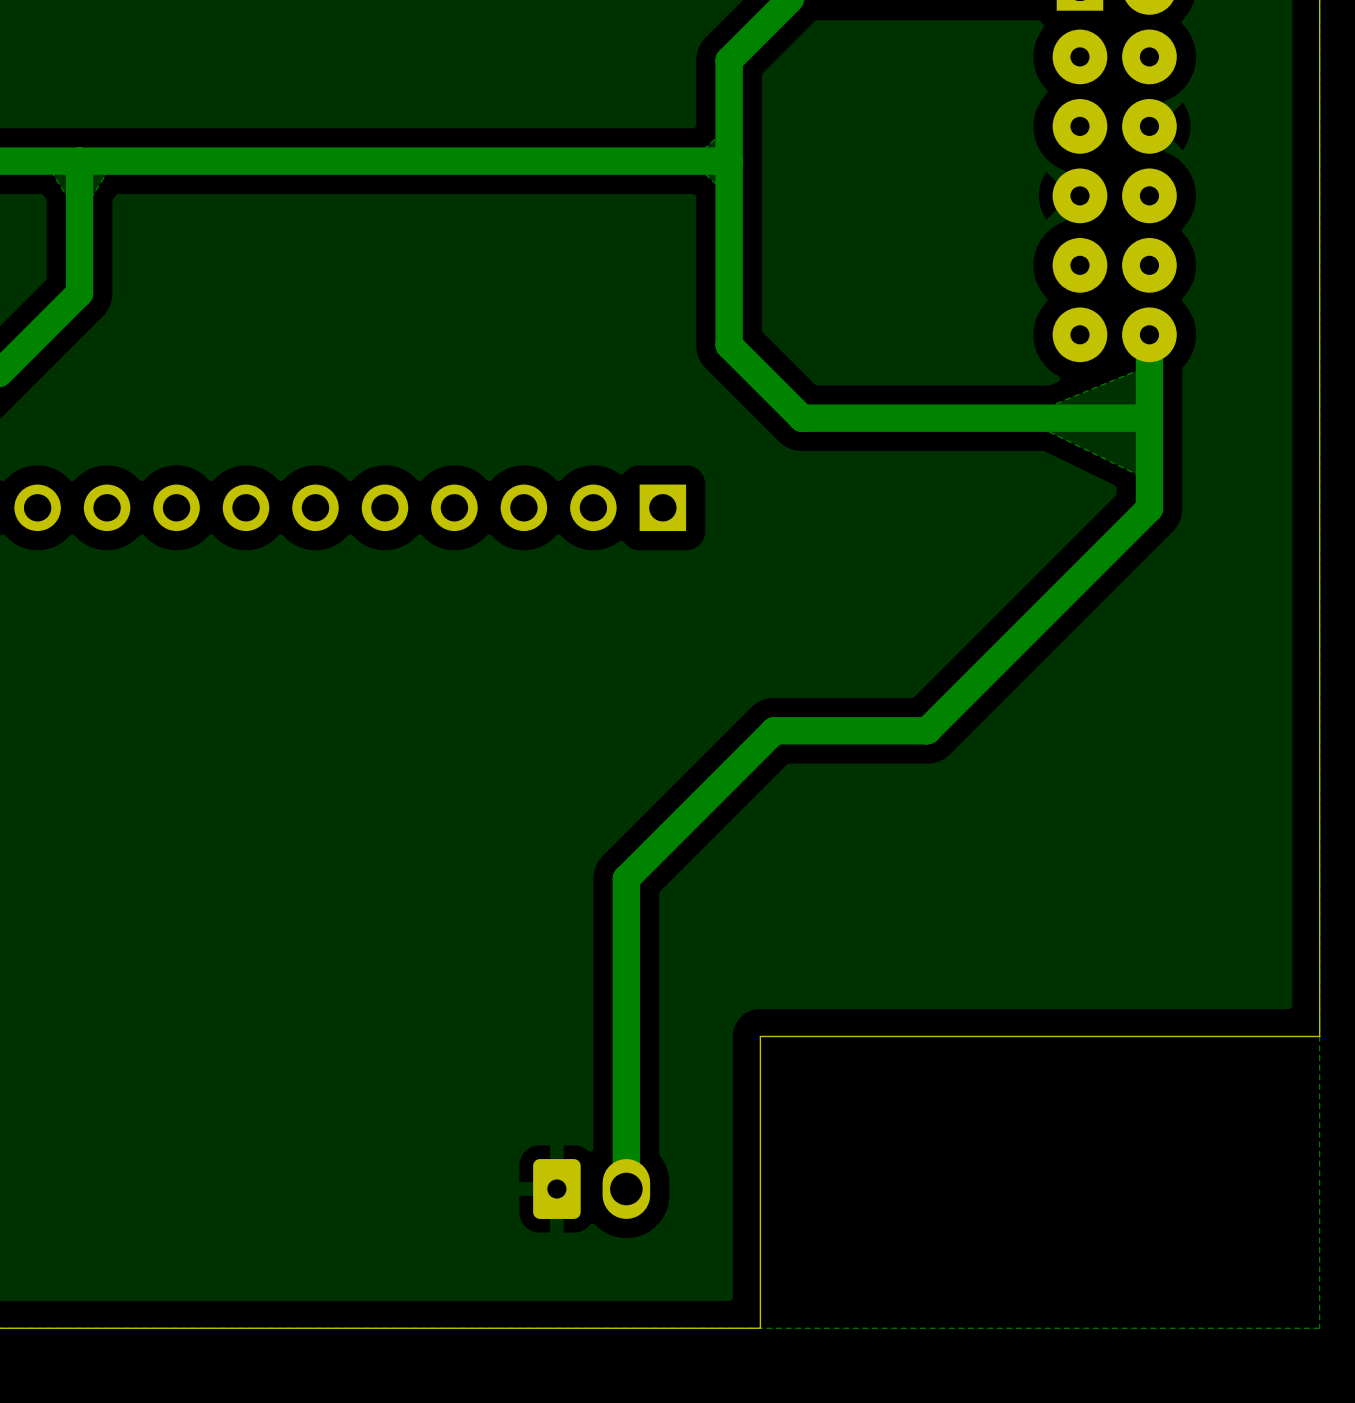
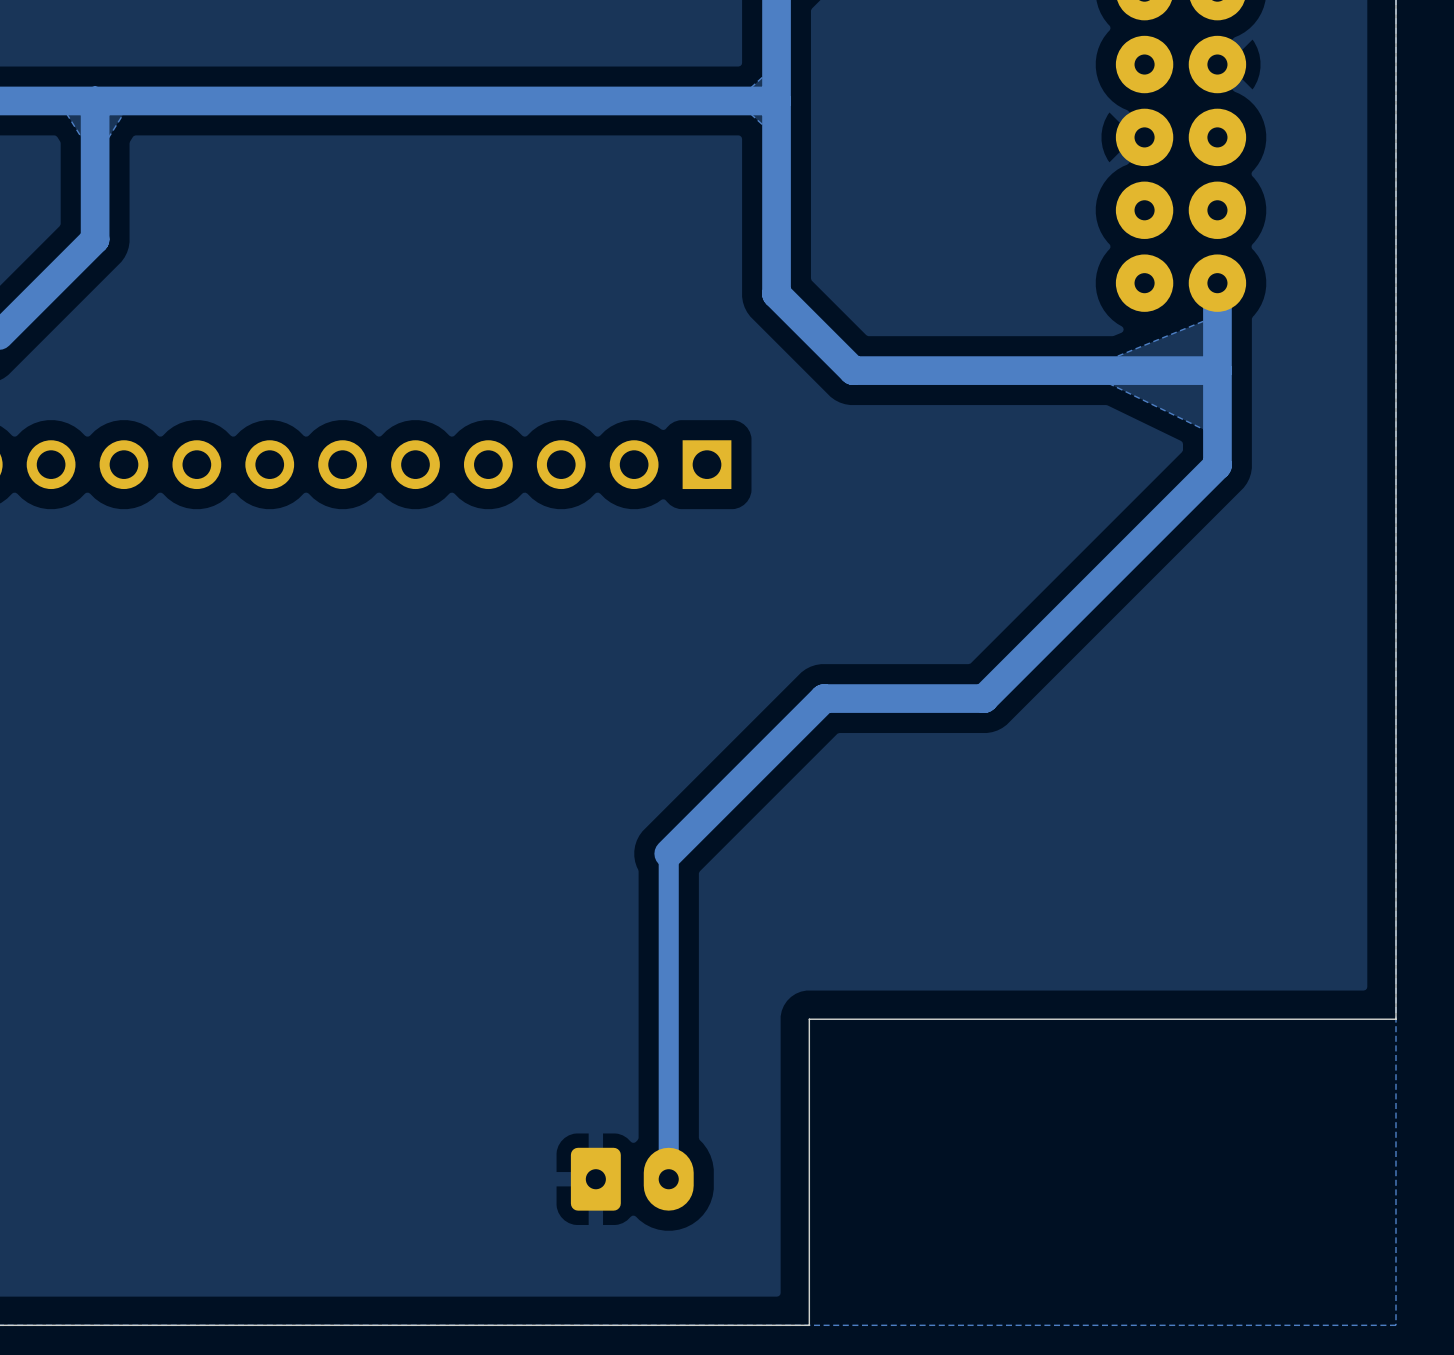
track width: thick (626, 878) (626, 1188) -> thin (668, 853) (668, 1179)
part footprint: [533, 1159, 651, 1219] -> [570, 1147, 694, 1211]

